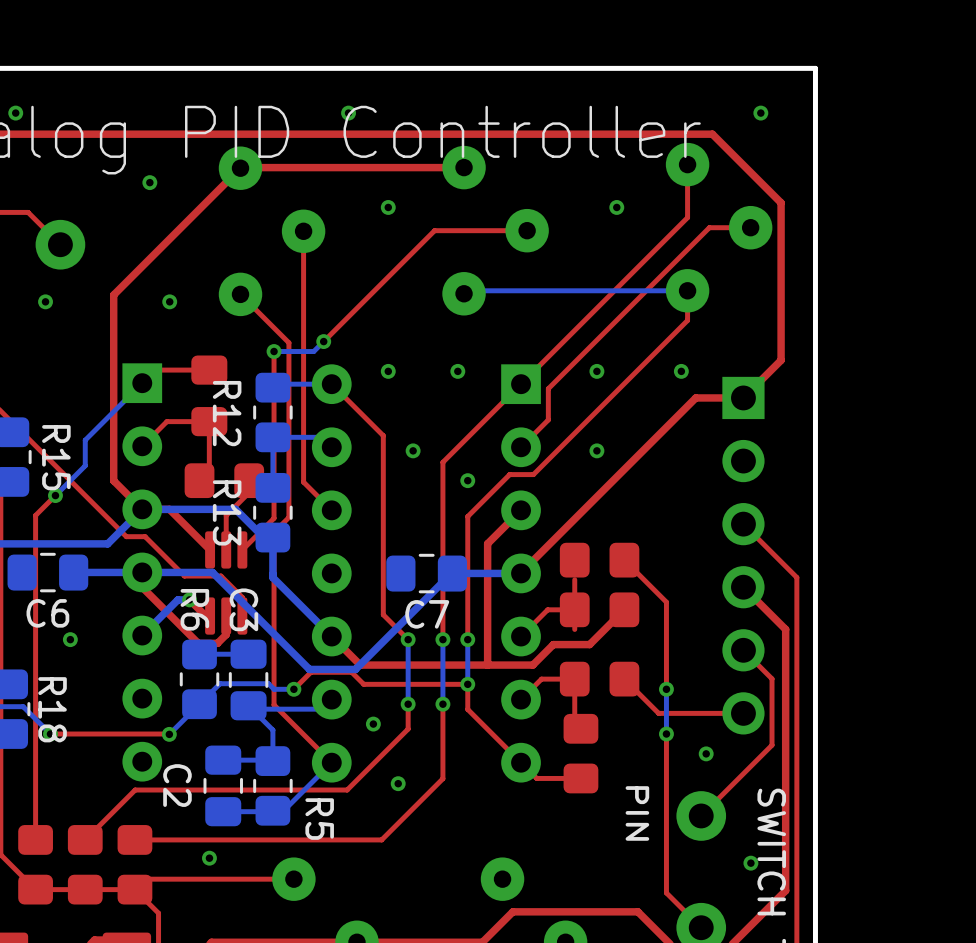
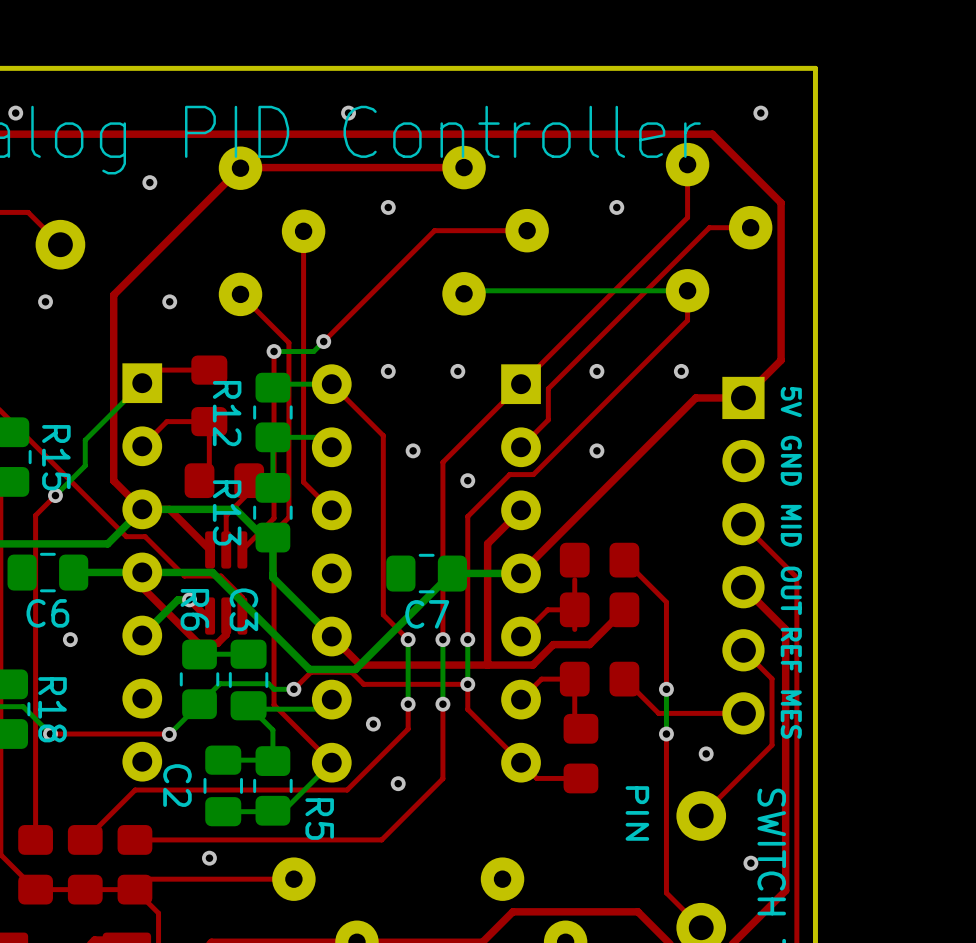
text: none -> 5V (791, 402)
text: none -> GND (791, 460)
text: none -> MID (791, 525)
text: none -> OUT (791, 590)
text: none -> REF (791, 650)
text: none -> MES (791, 714)

